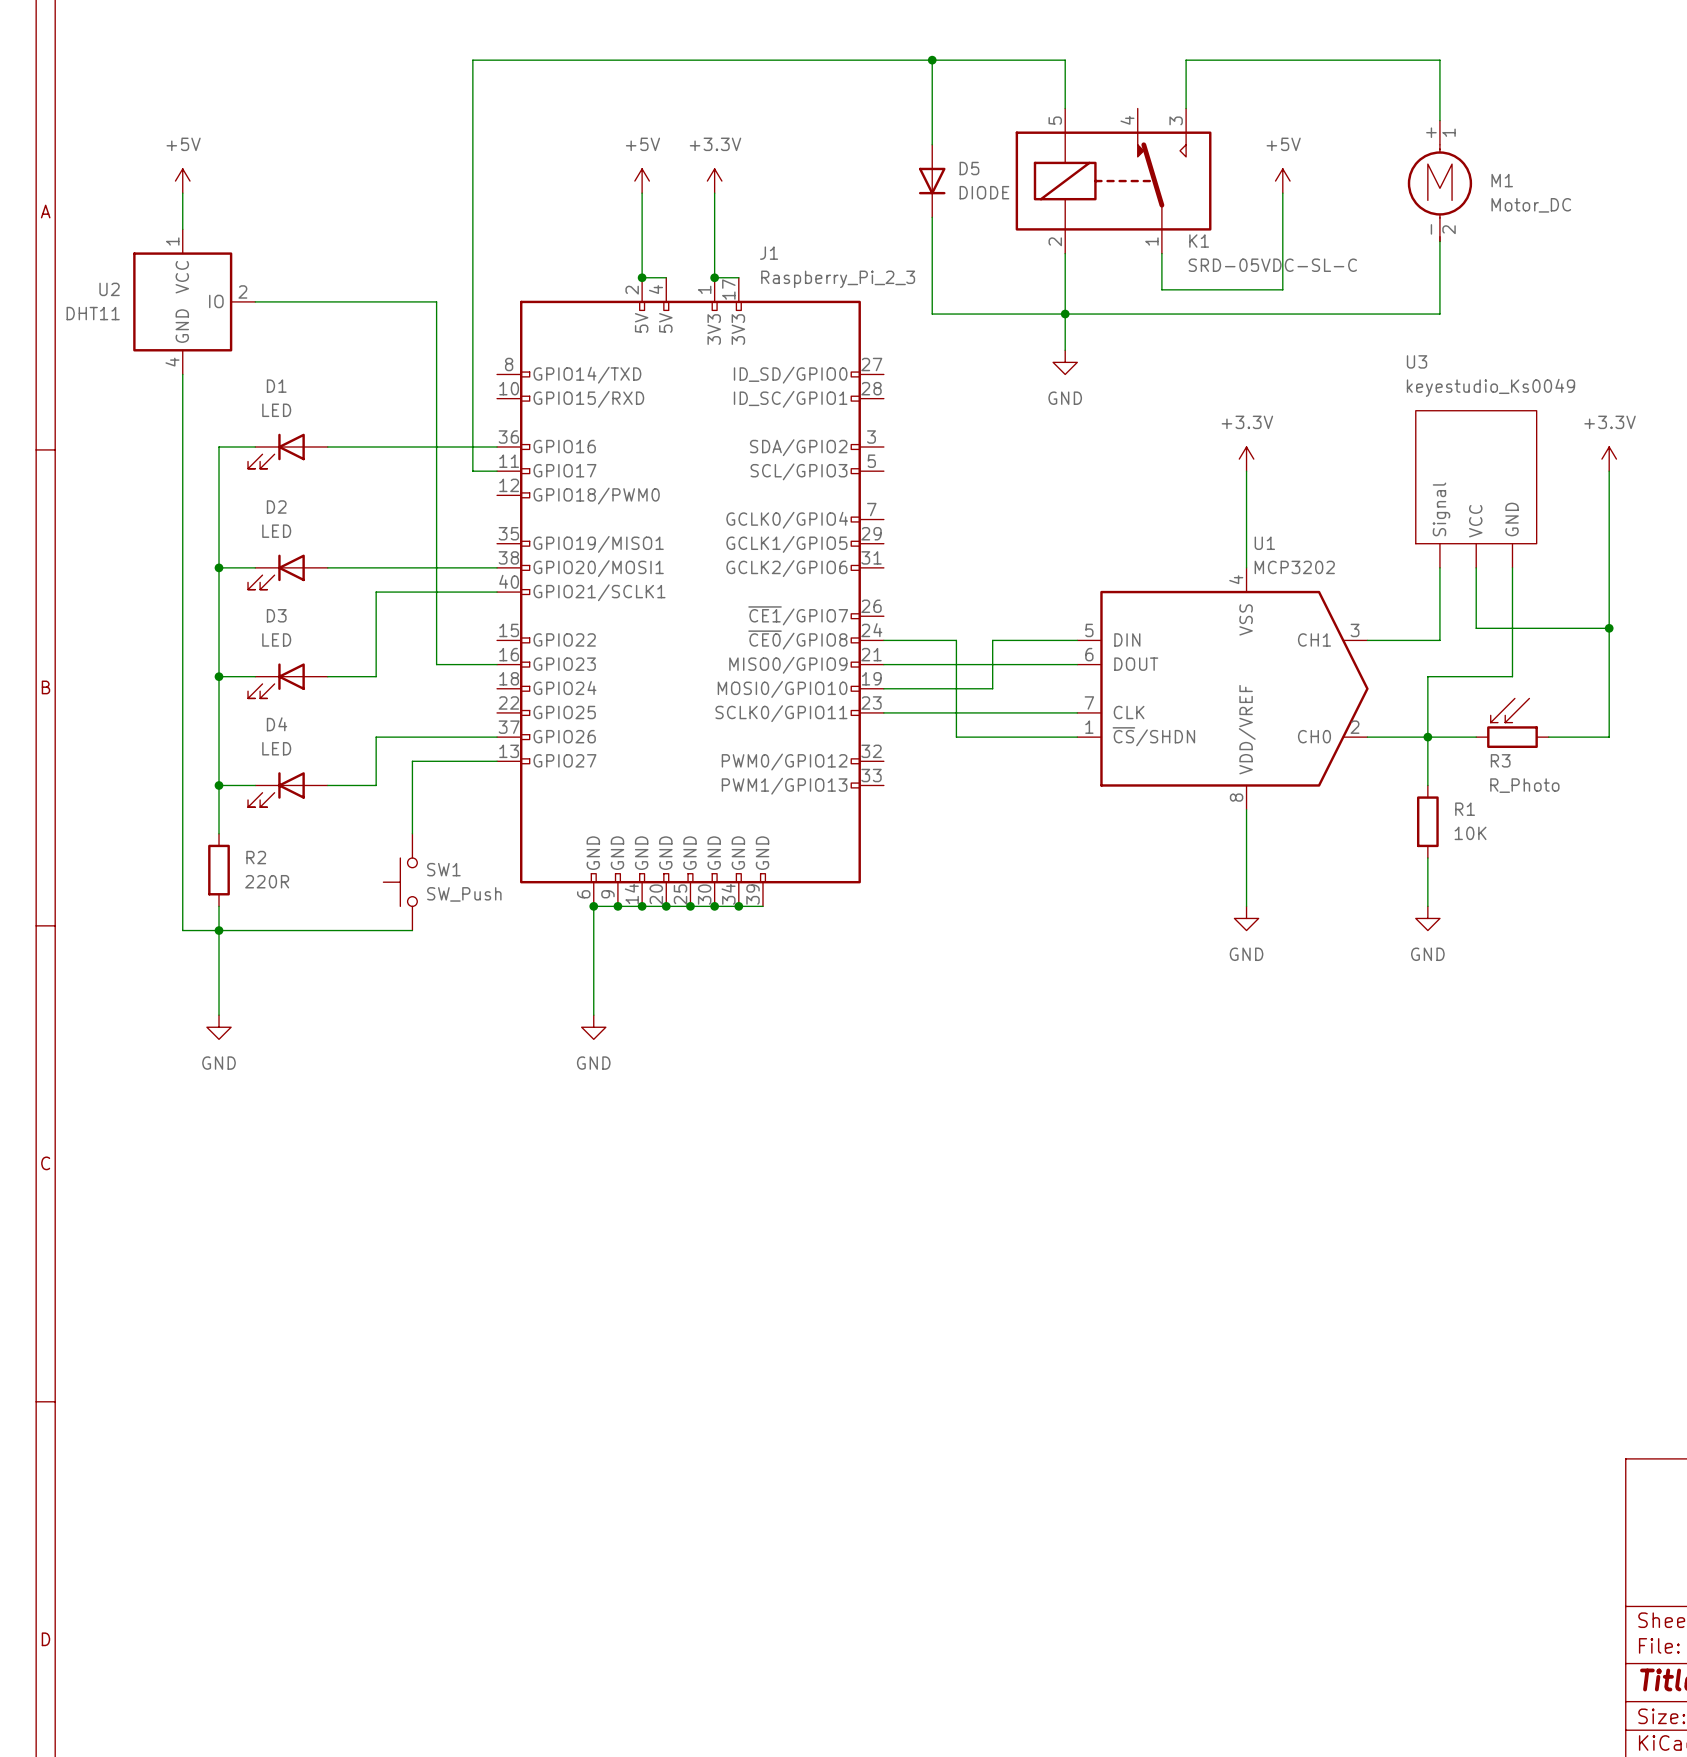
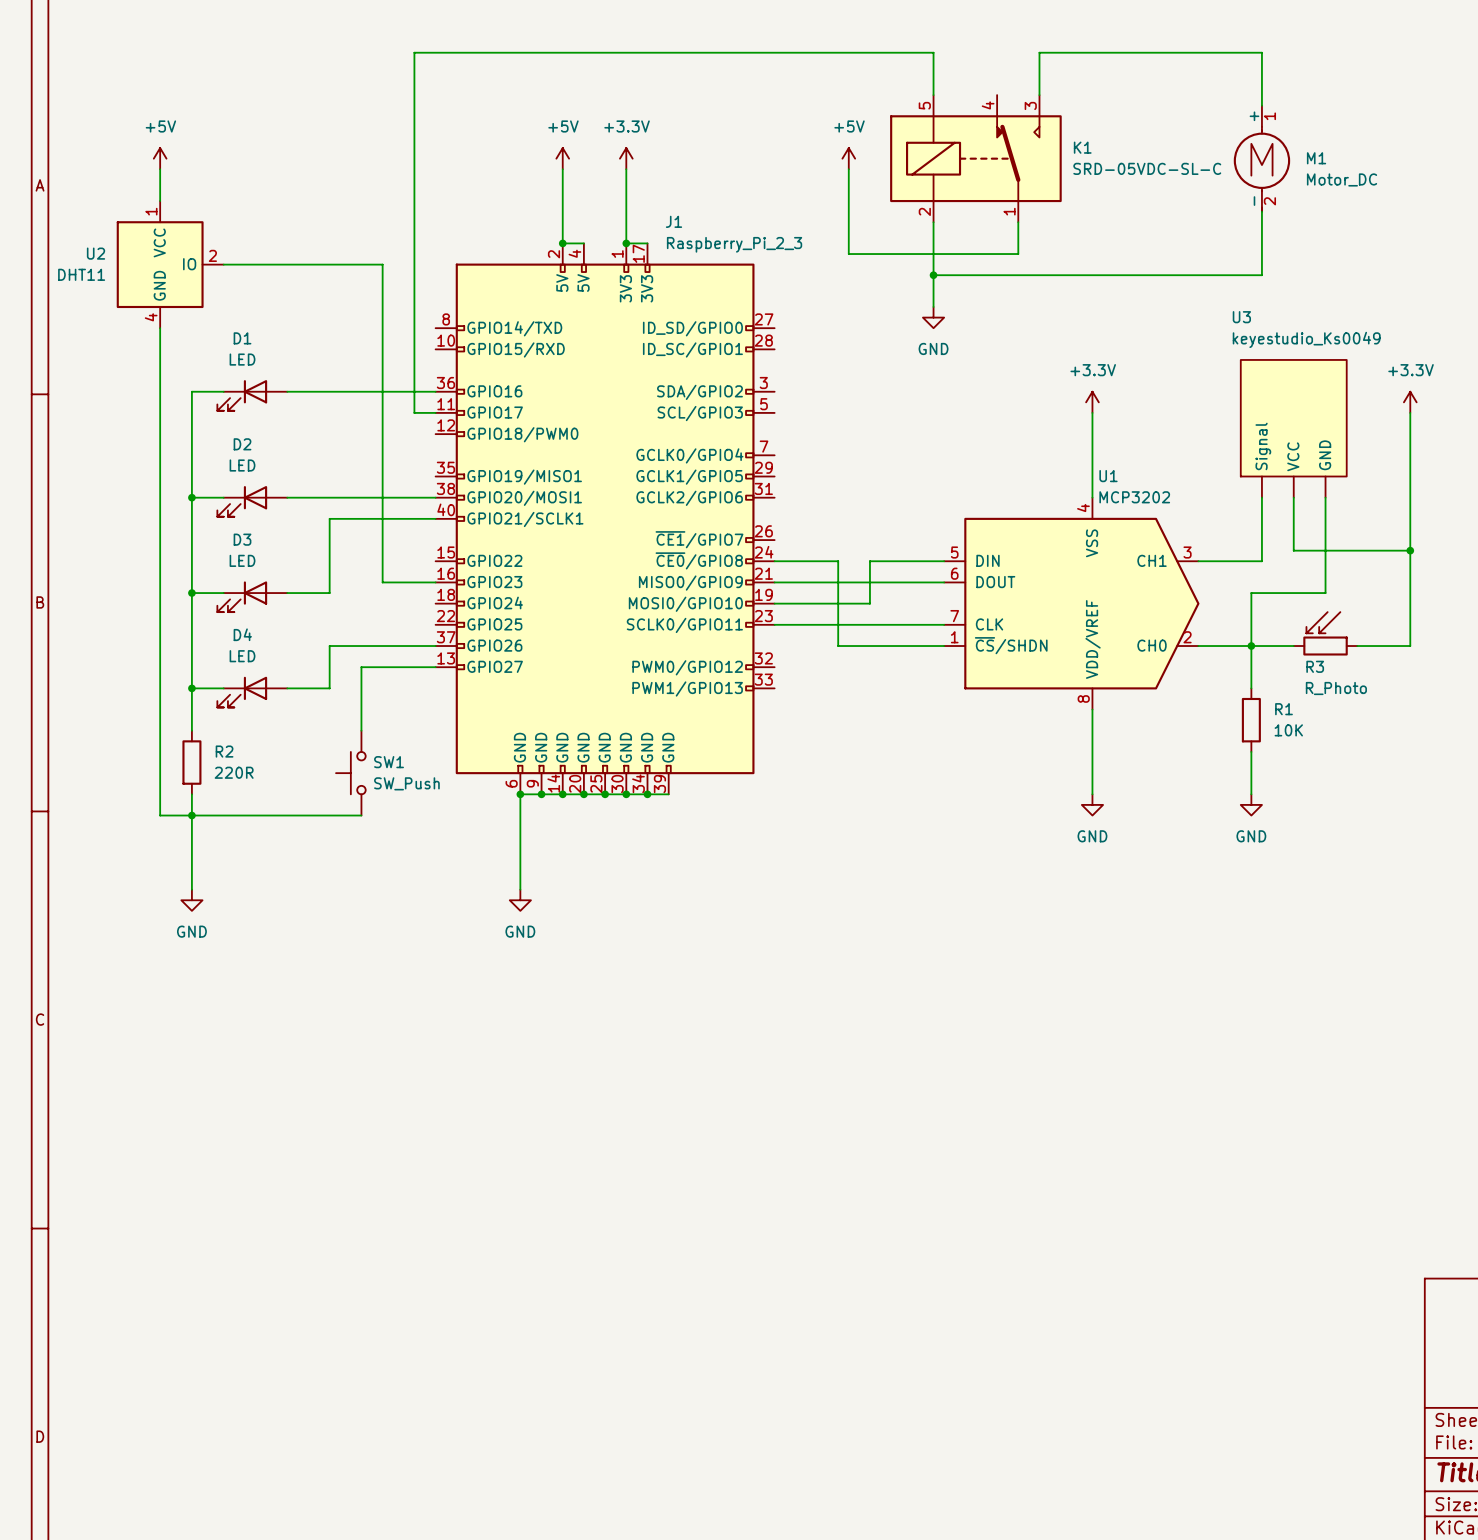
wire: (932, 60) (932, 144) -> none
junction: (932, 60) -> none
D5: DIODE (932, 181) -> none
power symbol: none -> +5V (848, 158)
power symbol: +5V (1282, 181) -> none
wire: (1282, 193) (1282, 289) (1161, 289) -> (848, 169) (848, 254) (1018, 254)
wire: (932, 217) (932, 314) (1065, 314) -> none
K1 name position: K1 (1199, 241) -> K1 (1082, 147)
K1 value position: SRD-05VDC-SL-C (1272, 265) -> SRD-05VDC-SL-C (1147, 168)

